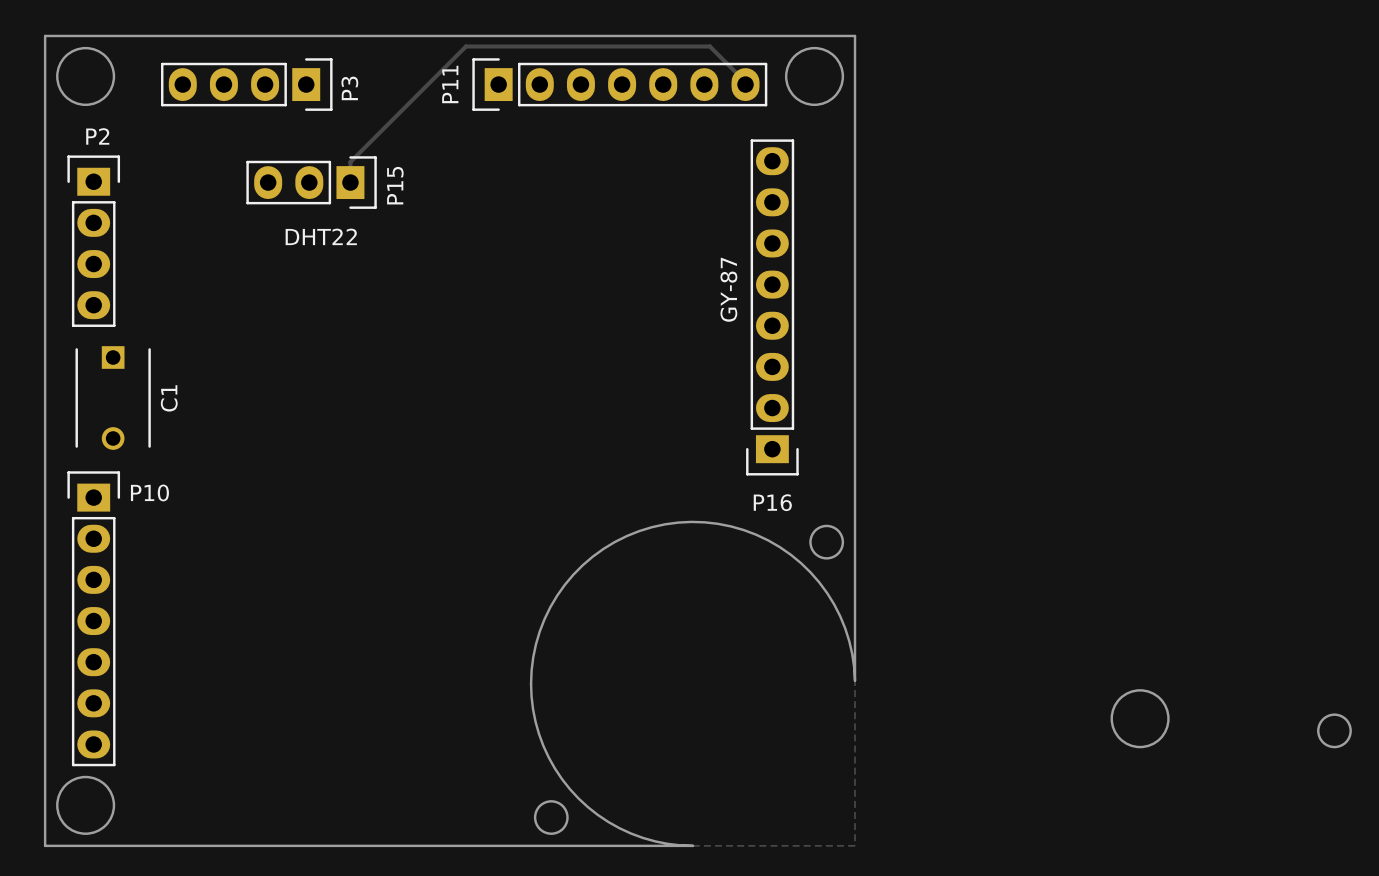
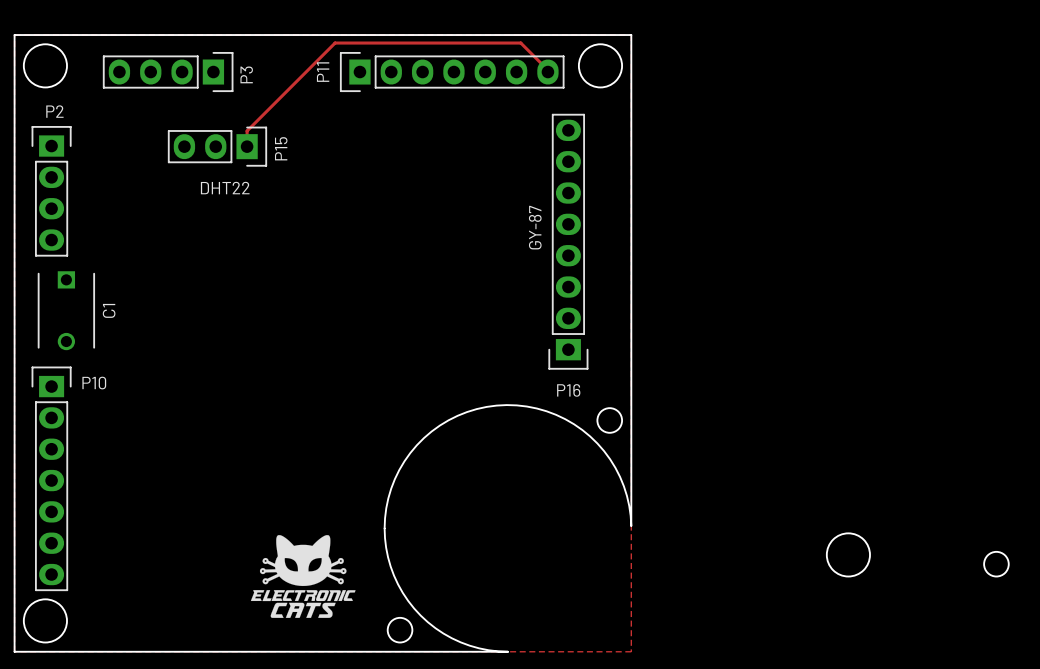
drawing: none -> [250, 535, 356, 618]

